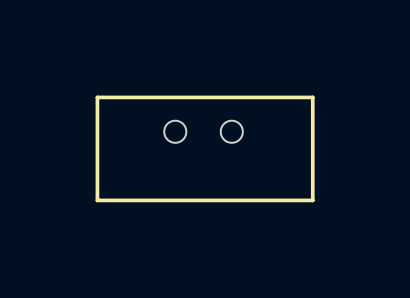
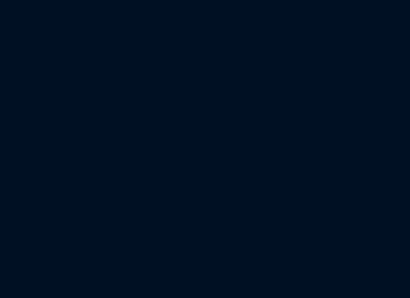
part: (205, 148) -> none

